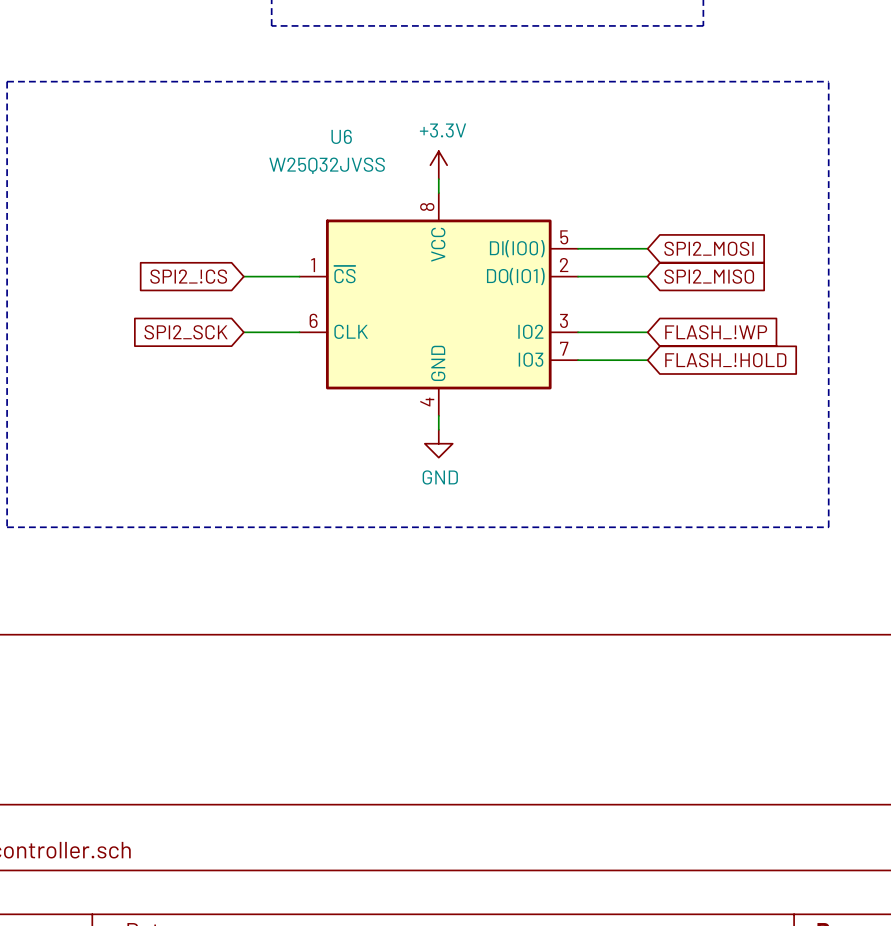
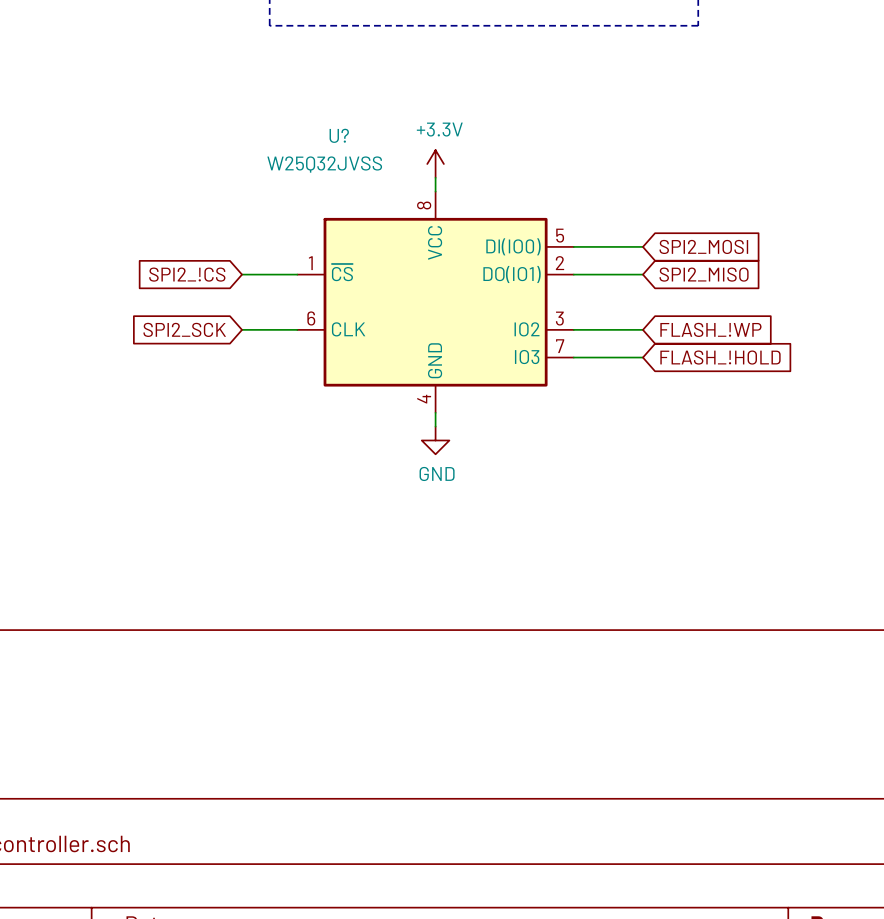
line: (7, 81) (7, 527) (828, 527) (828, 81) (7, 81) -> none
U6 name: U6 (341, 136) -> U? (339, 135)

